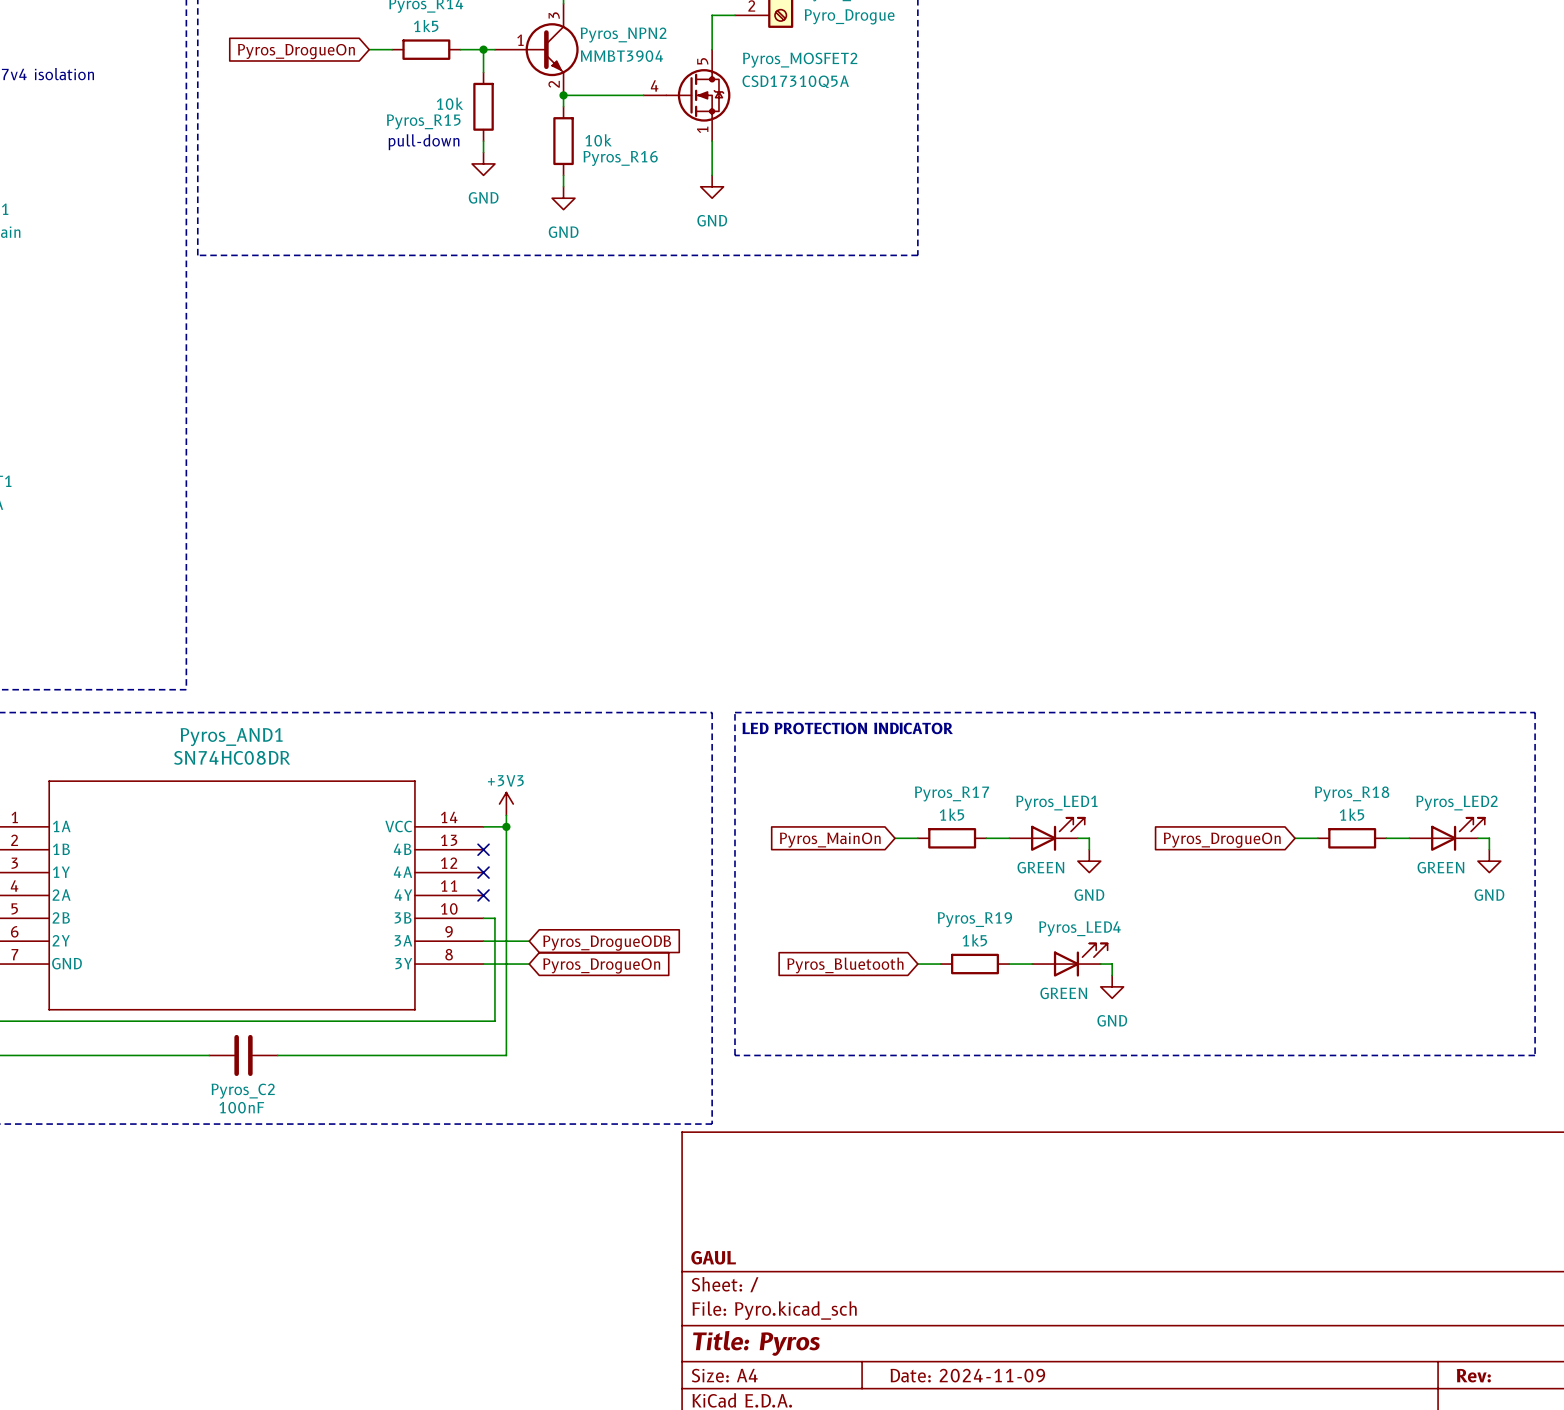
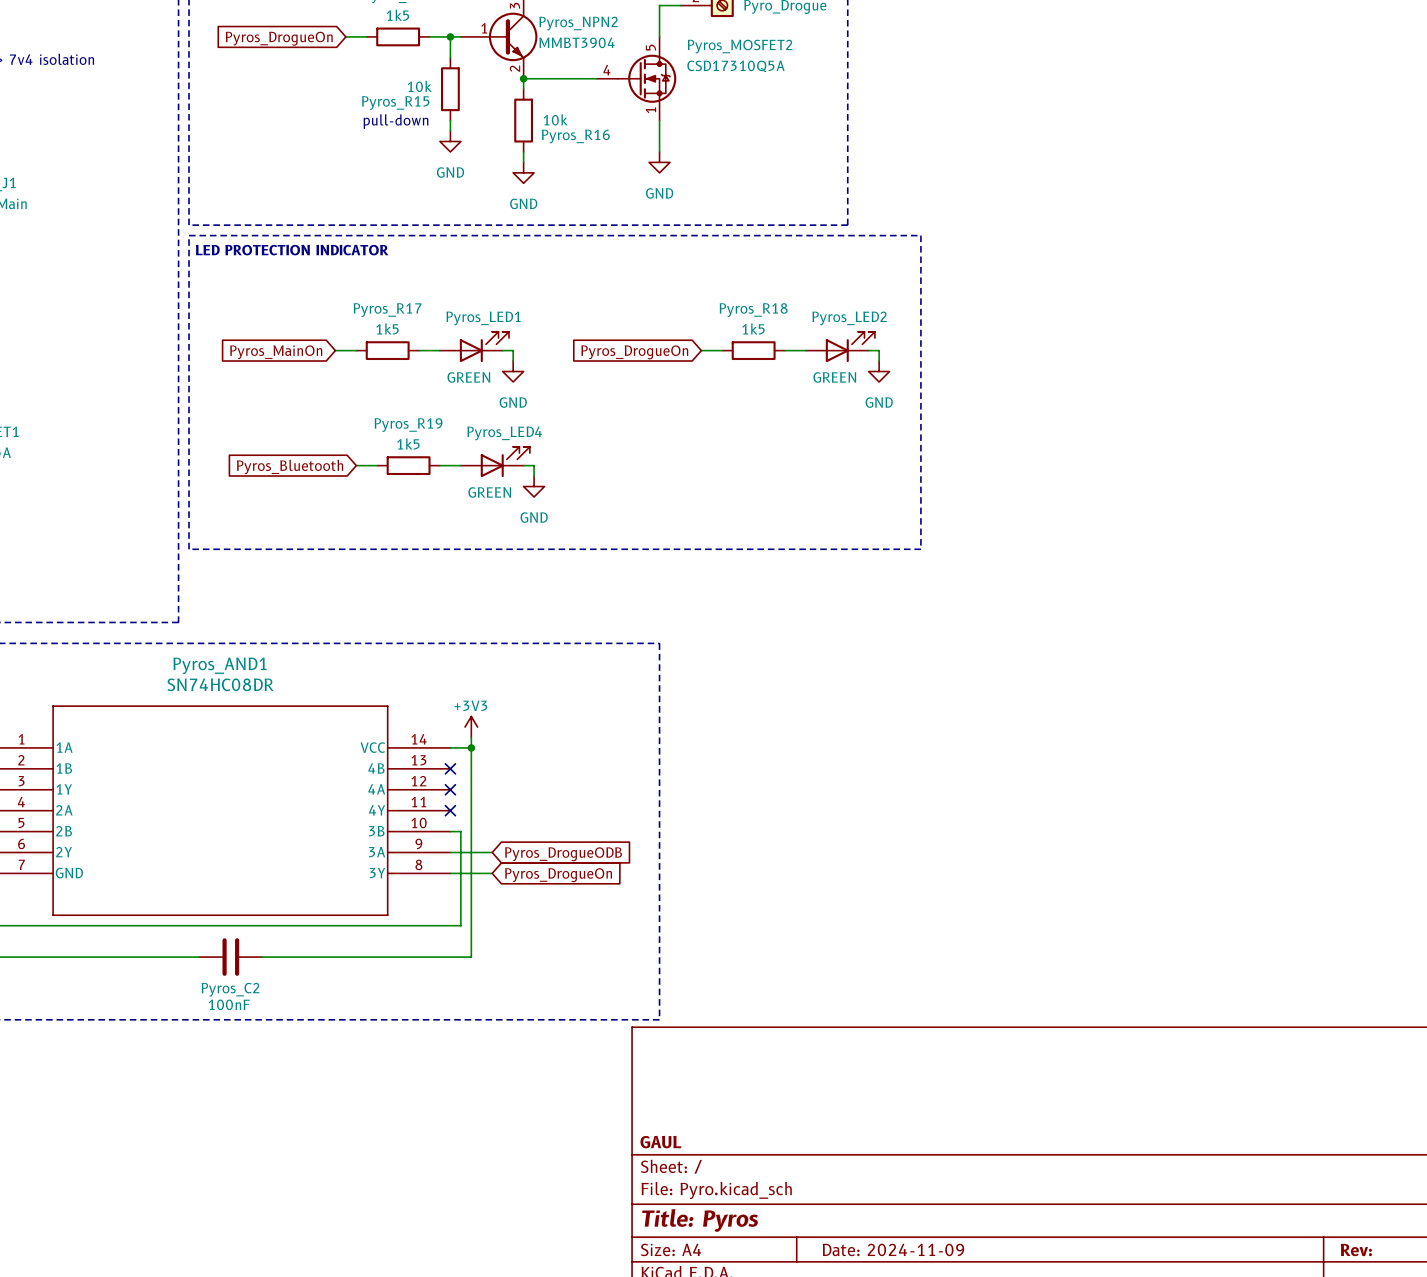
line: none -> (189, 235) (920, 235) (920, 549) (189, 549) (189, 235)
text: none -> LED PROTECTION INDICATOR (292, 250)
wire: none -> (335, 350) (356, 350)
wire: none -> (419, 350) (439, 350)
wire: none -> (502, 350) (513, 350) (513, 361)
wire: none -> (701, 350) (722, 350)
wire: none -> (785, 350) (805, 350)
wire: none -> (868, 350) (879, 350) (879, 361)
global label: none -> Pyros_MainOn (276, 352)
global label: none -> Pyros_DrogueOn (634, 352)
power symbol: none -> GND (513, 371)
power symbol: none -> GND (879, 371)
wire: none -> (356, 465) (377, 465)
wire: none -> (439, 465) (460, 465)
wire: none -> (523, 465) (534, 465) (534, 476)
global label: none -> Pyros_Bluetooth (290, 466)
power symbol: none -> GND (534, 486)
line: (734, 712) (1535, 712) (1535, 1055) (734, 1055) (734, 712) -> none
text: LED PROTECTION INDICATOR (847, 728) -> none
Pyros_LED1 position: (1047, 834) -> (474, 346)
Pyros_LED2 position: (1447, 834) -> (840, 346)
wire: (895, 838) (917, 838) -> none
Pyros_R17 position: (952, 838) -> (387, 350)
wire: (986, 838) (1009, 838) -> none
wire: (1077, 838) (1089, 838) (1089, 849) -> none
wire: (1295, 838) (1317, 838) -> none
Pyros_R18 position: (1352, 838) -> (753, 350)
wire: (1386, 838) (1409, 838) -> none
wire: (1477, 838) (1489, 838) (1489, 849) -> none
global label: Pyros_MainOn (830, 840) -> none
global label: Pyros_DrogueOn (1222, 840) -> none
power symbol: GND (1089, 861) -> none
power symbol: GND (1489, 861) -> none
Pyros_LED4 position: (1069, 960) -> (495, 461)
wire: (917, 964) (940, 964) -> none
Pyros_R19 position: (975, 964) -> (408, 465)
wire: (1009, 964) (1032, 964) -> none
wire: (1100, 964) (1112, 964) (1112, 975) -> none
global label: Pyros_Bluetooth (845, 965) -> none
power symbol: GND (1112, 986) -> none

